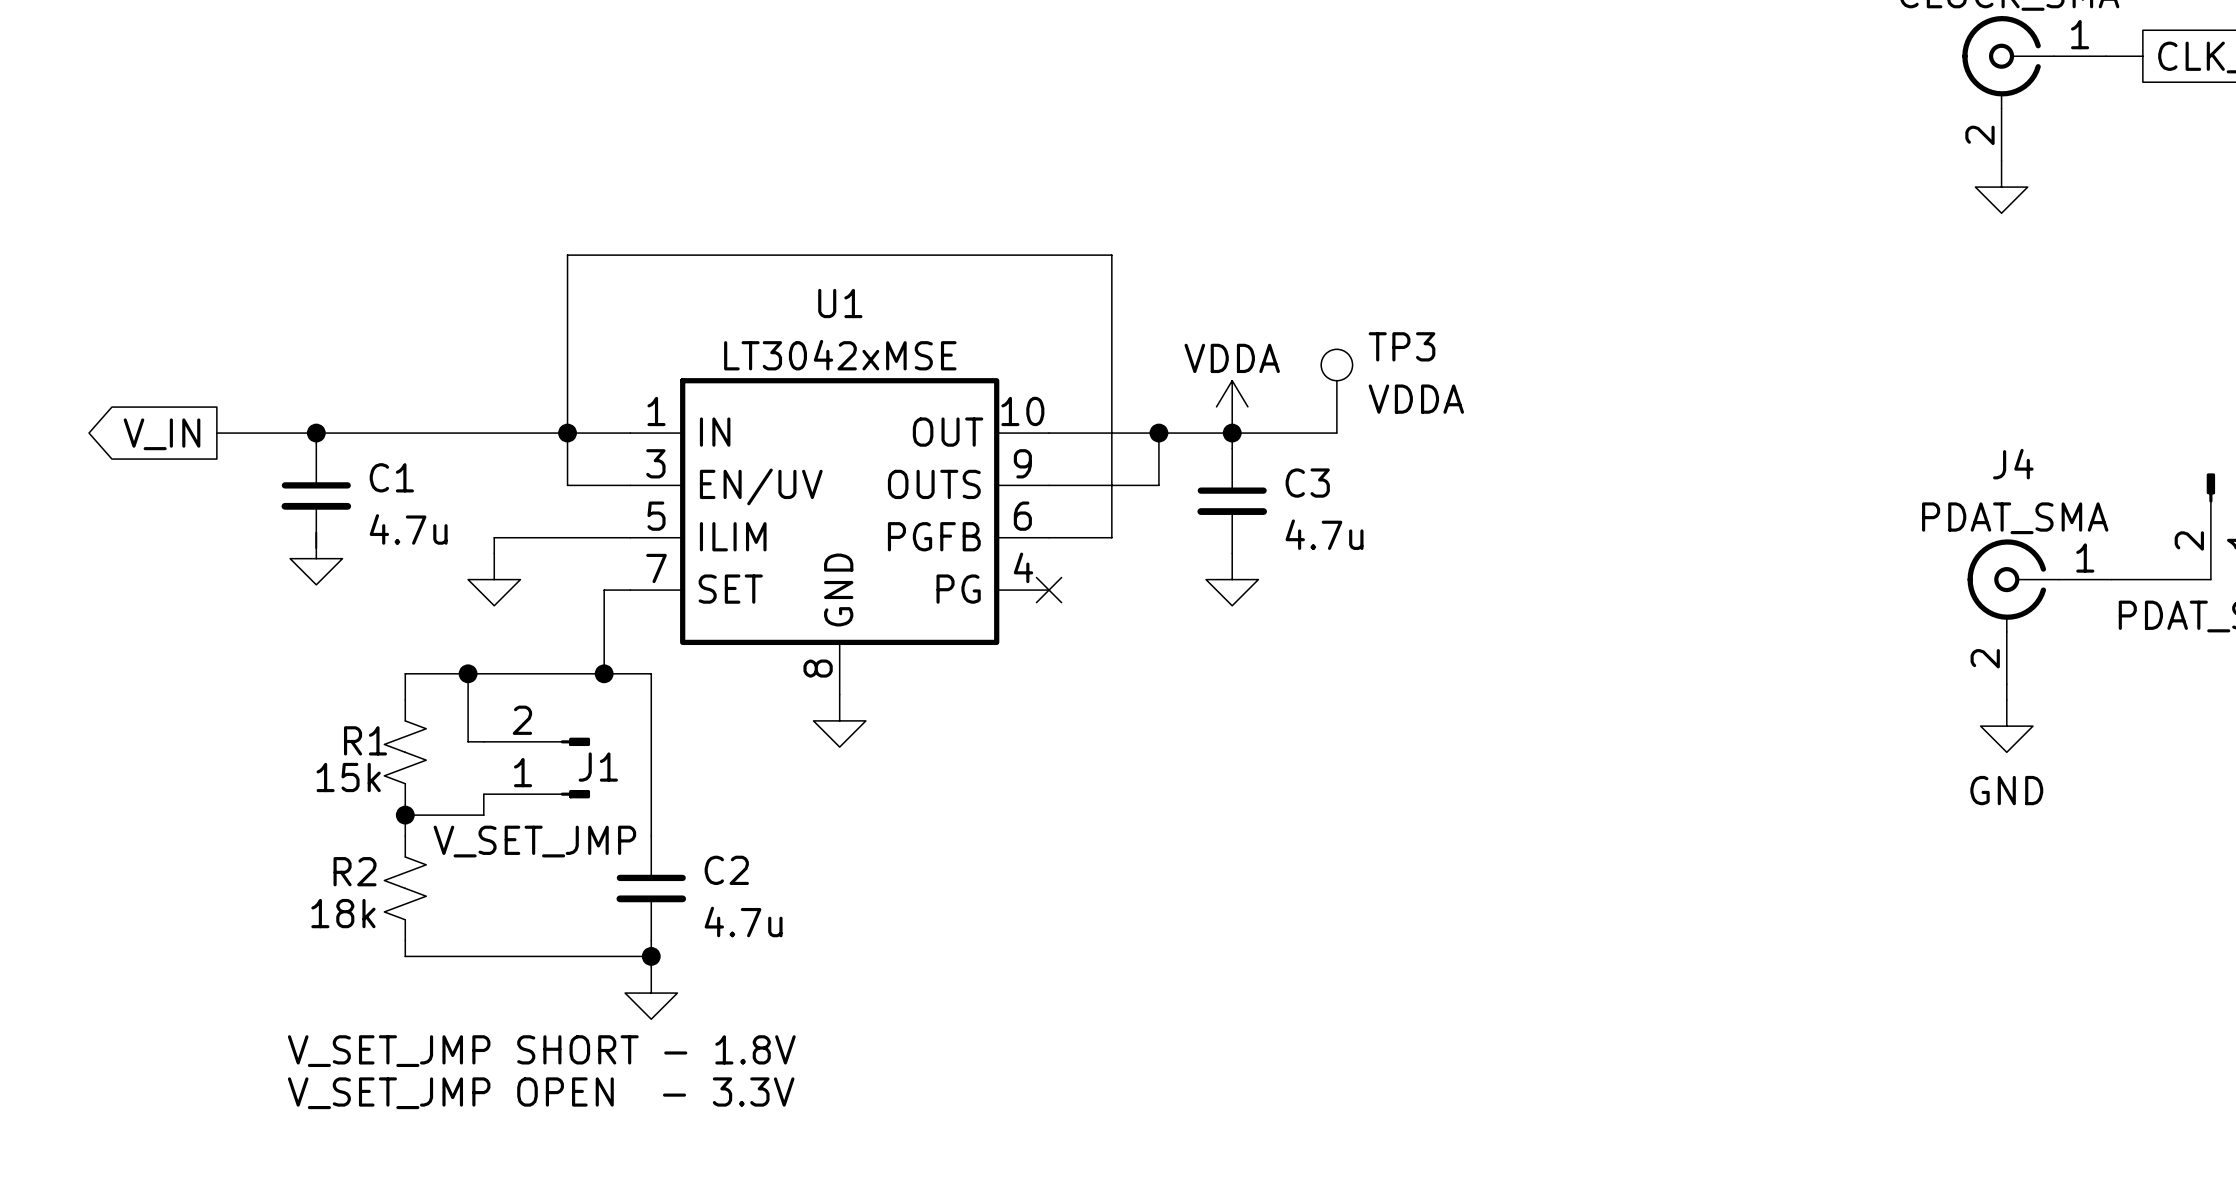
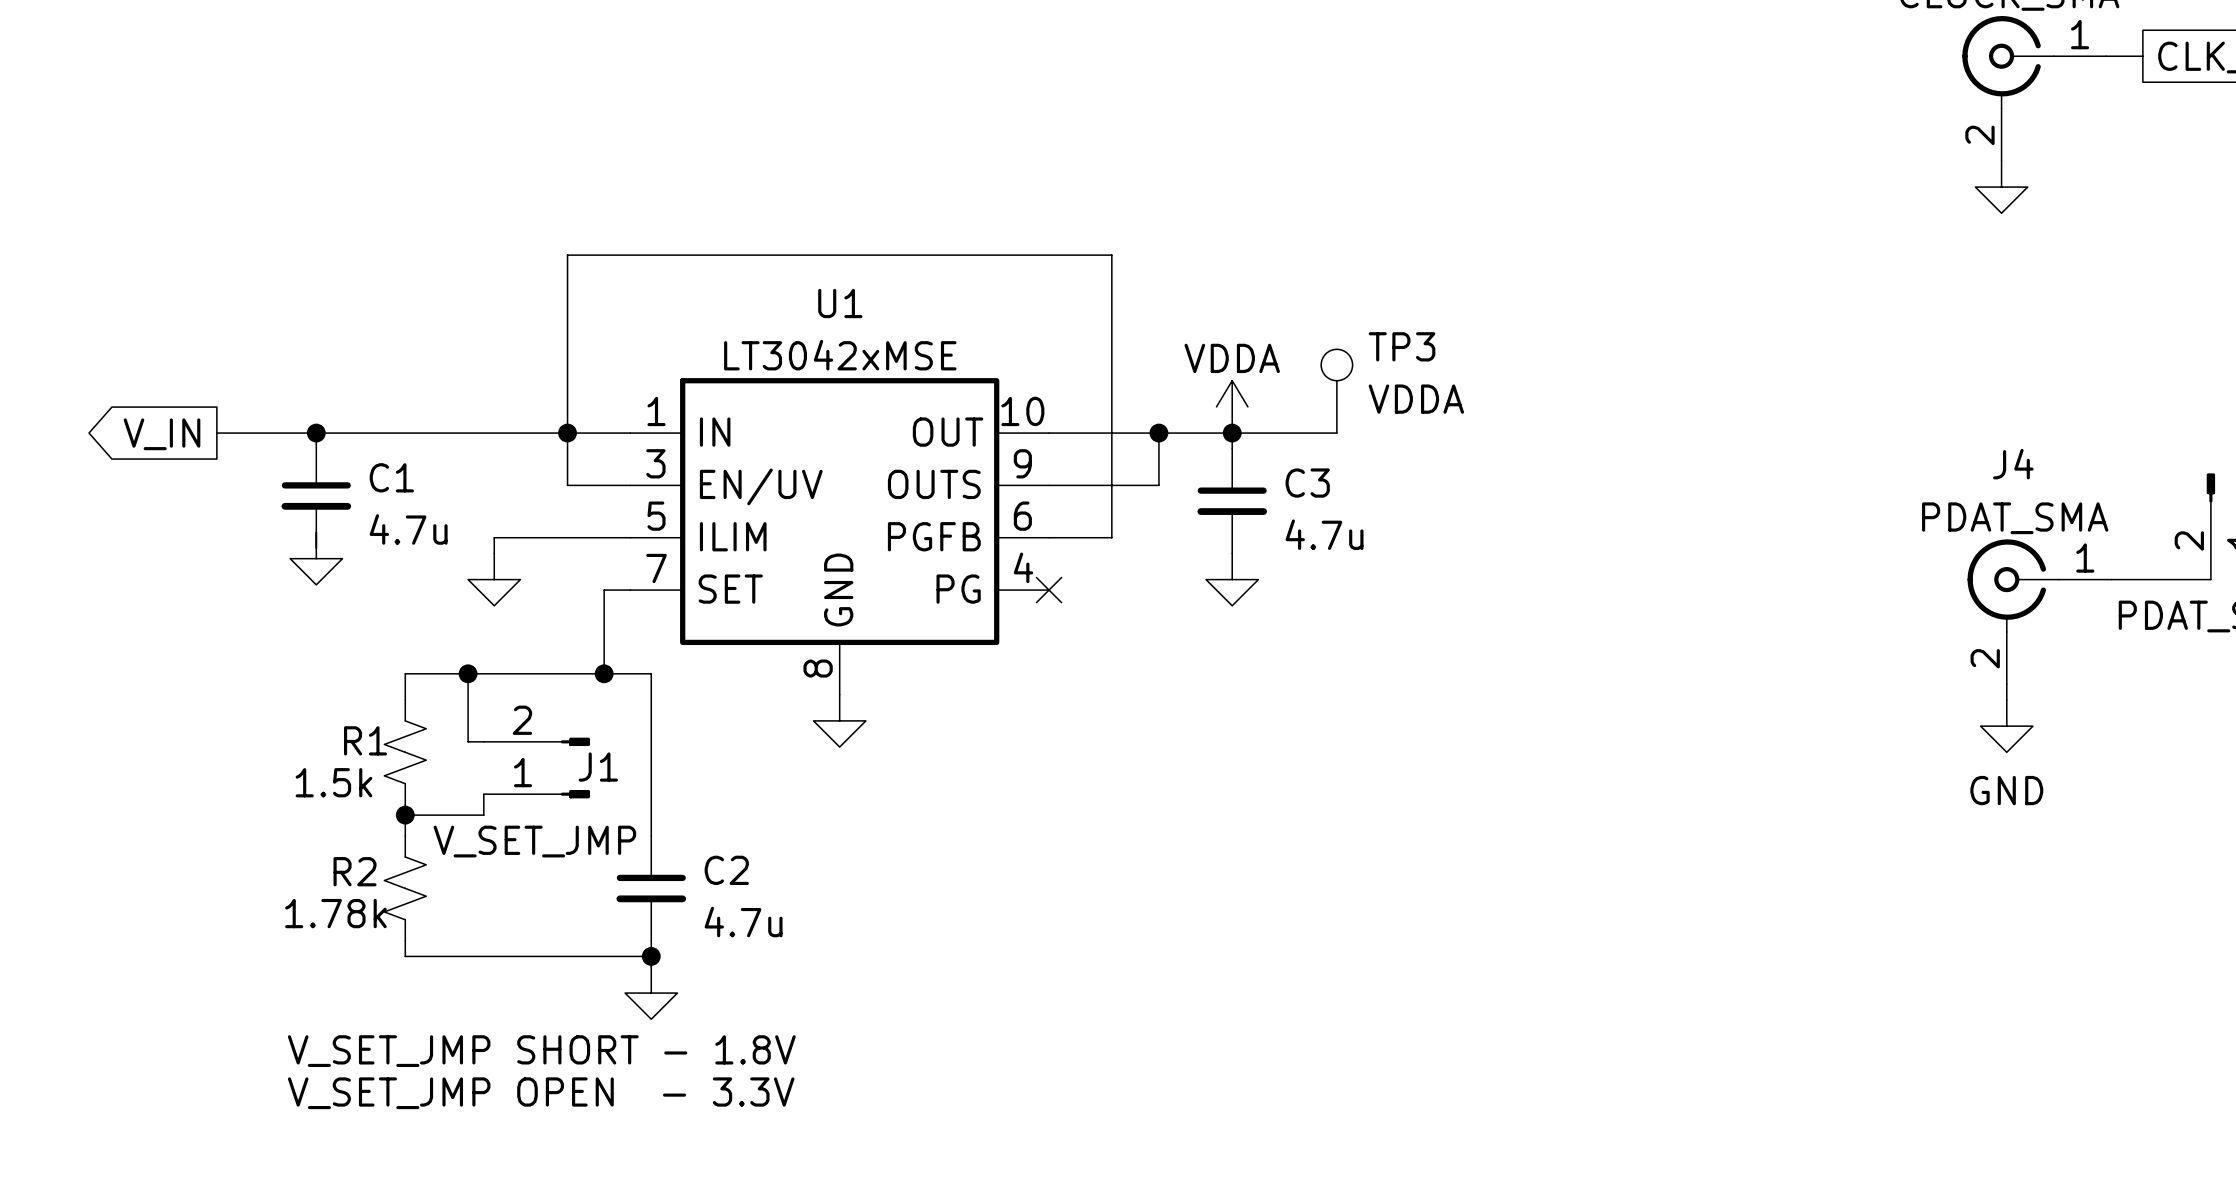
R1 value: 15k (348, 777) -> 1.5k (333, 782)
R2 value: 18k (343, 913) -> 1.78k (335, 913)

